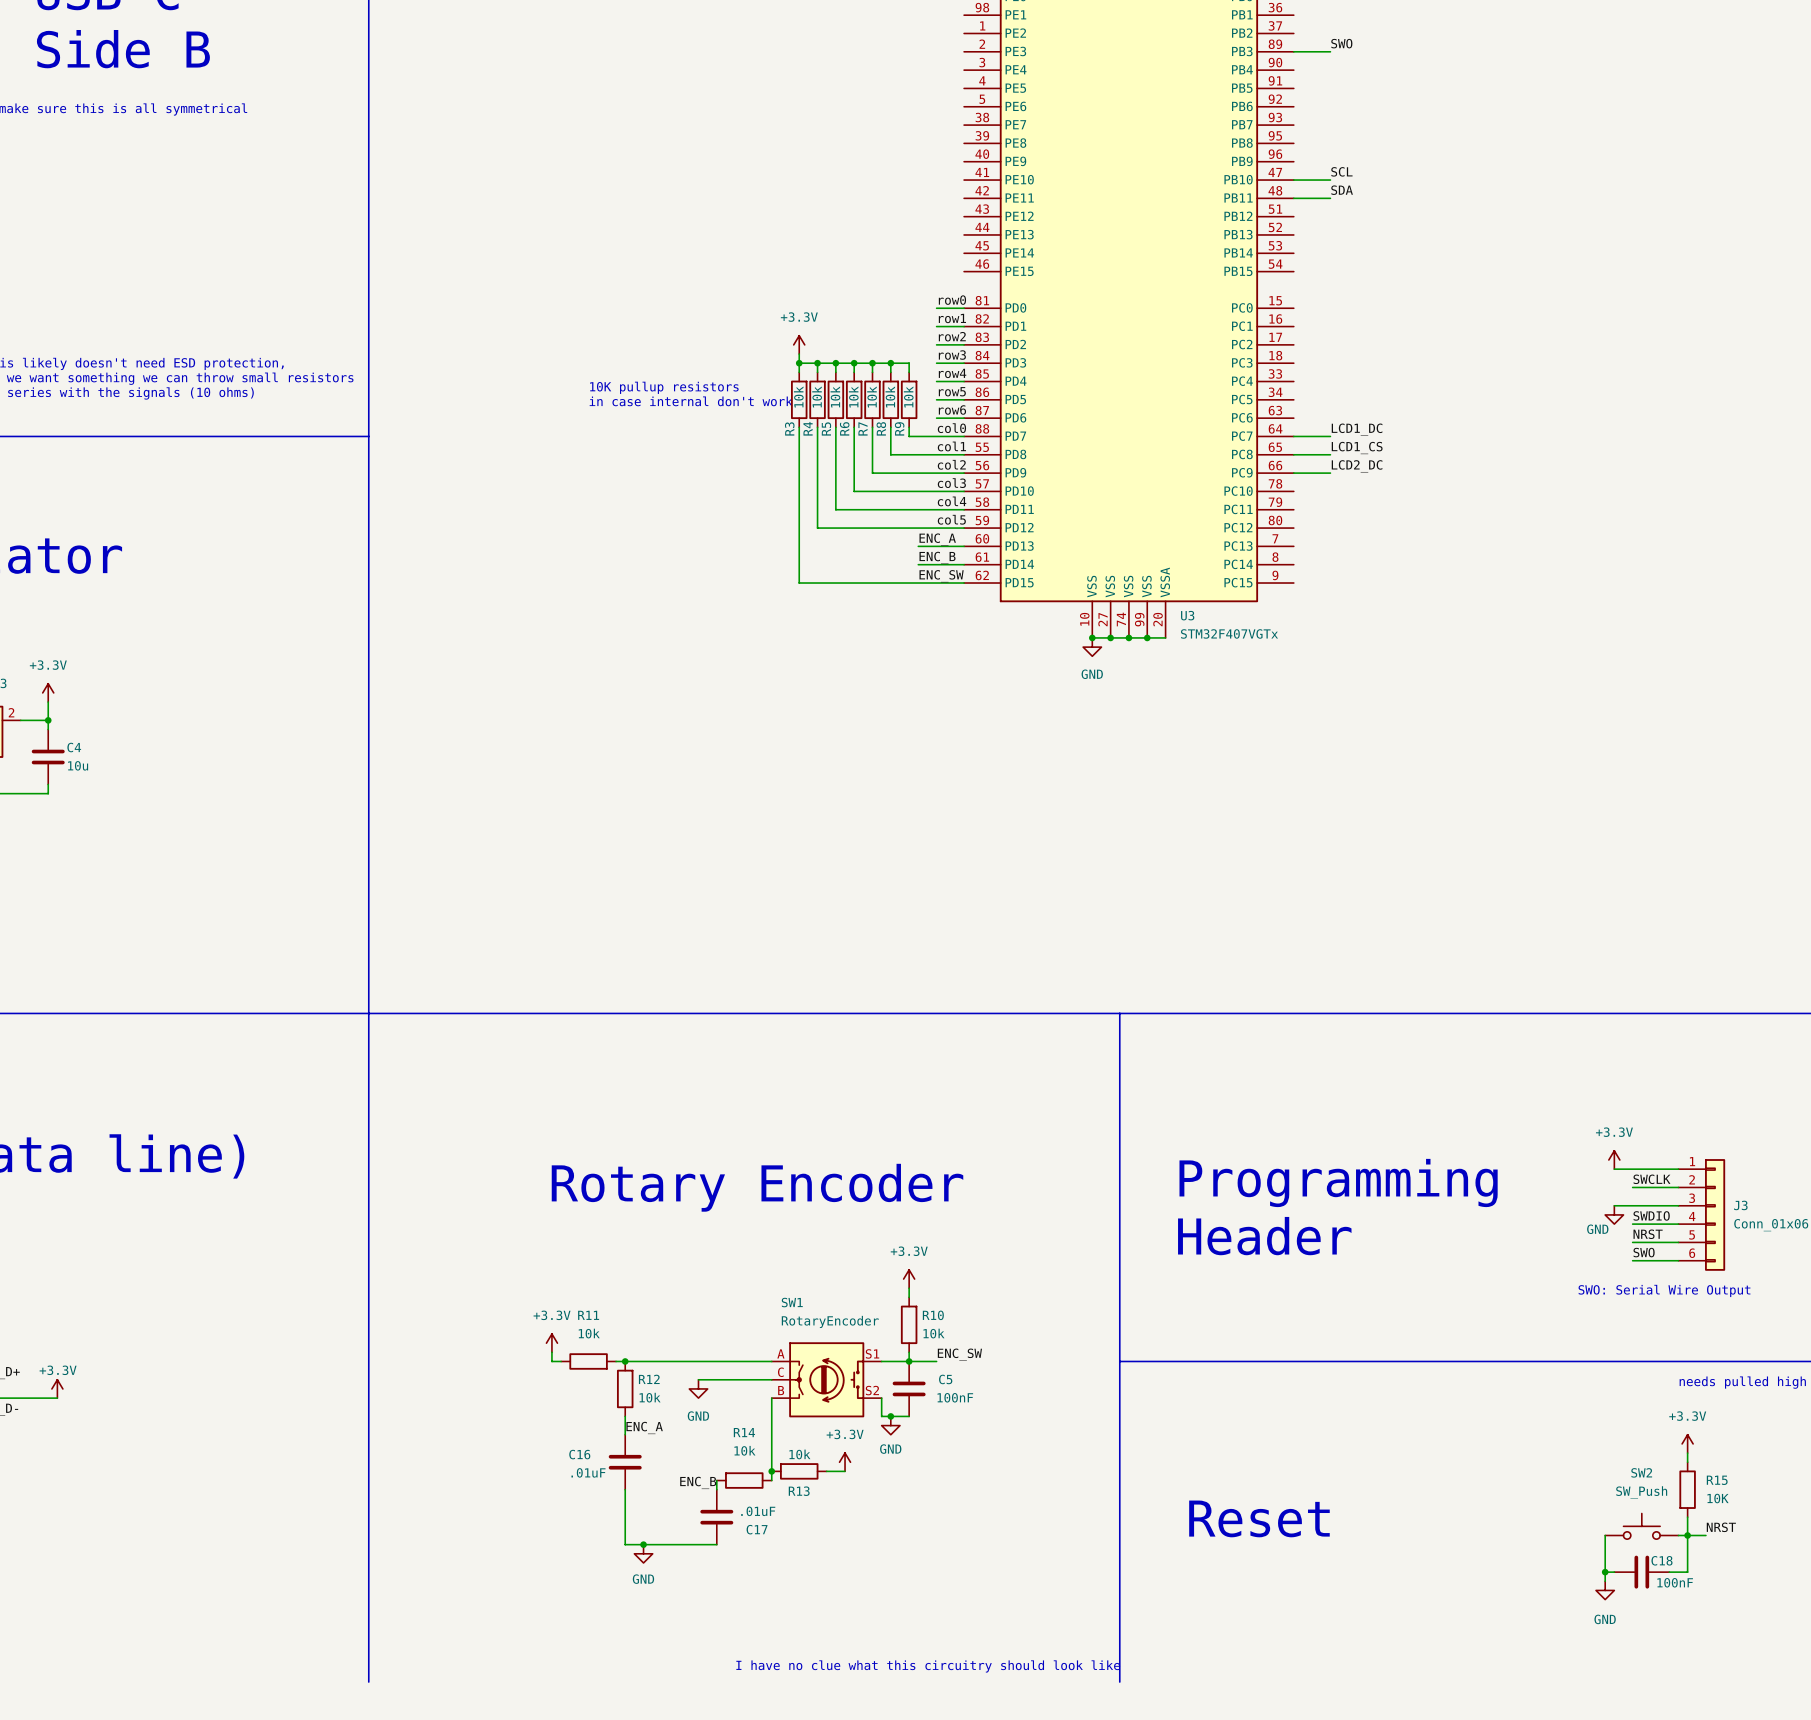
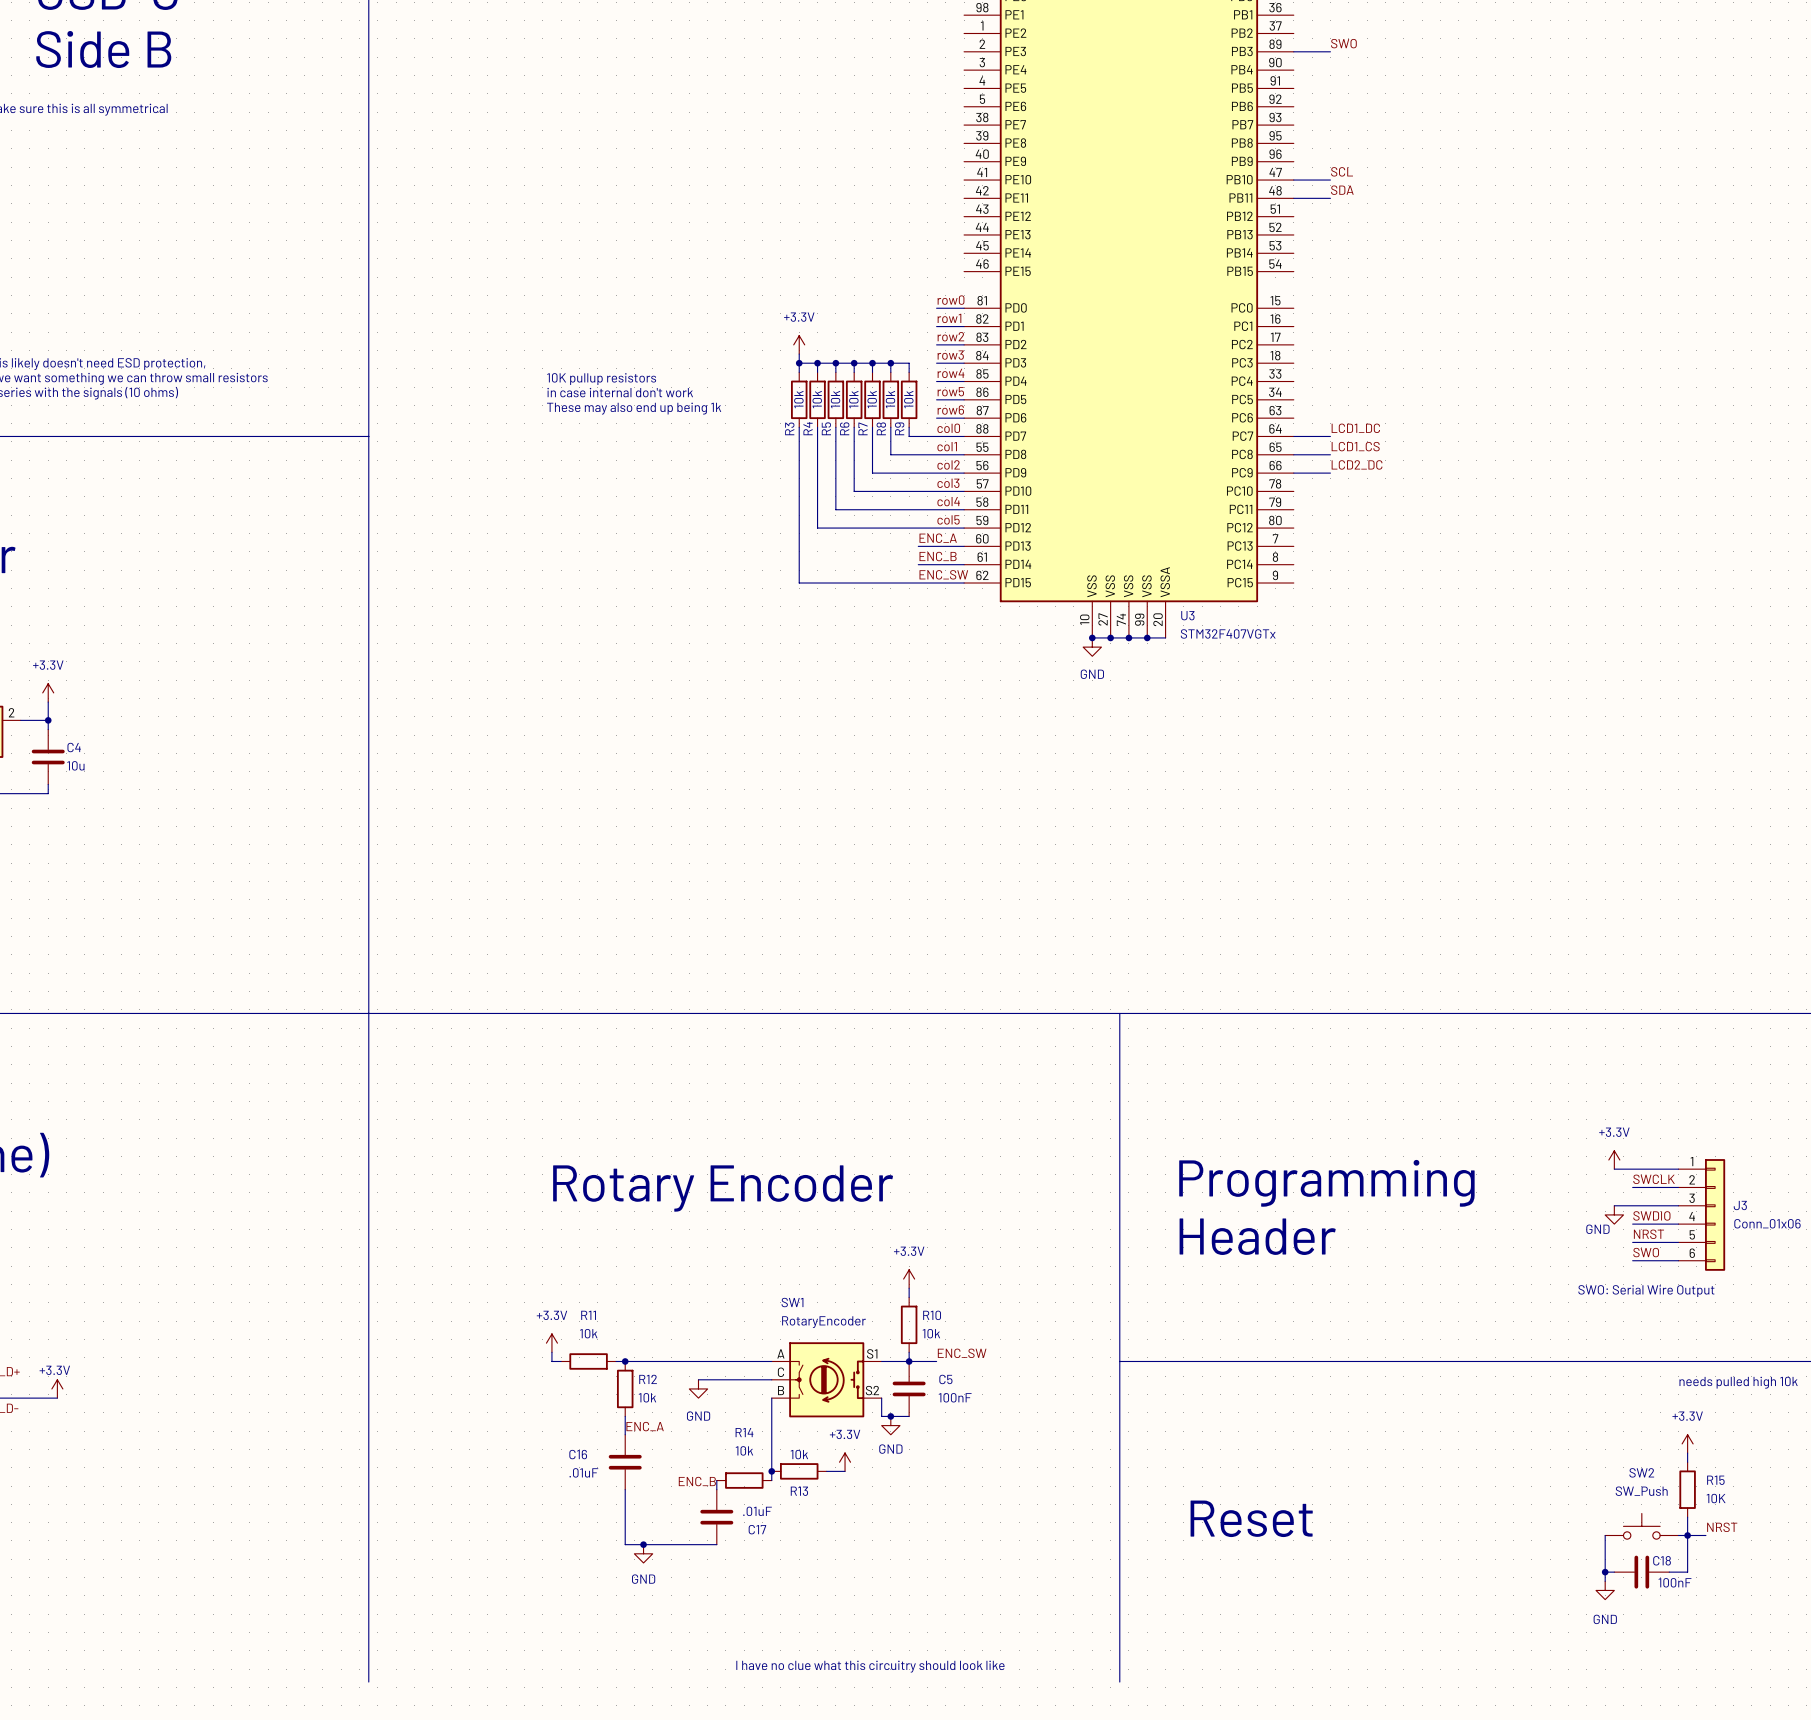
text position: 10K pullup resistors (664, 387) -> 10K pullup resistors (601, 379)
text position: in case internal don't work (691, 401) -> in case internal don't work (620, 392)
text: none -> These may also end up being 1k (634, 408)

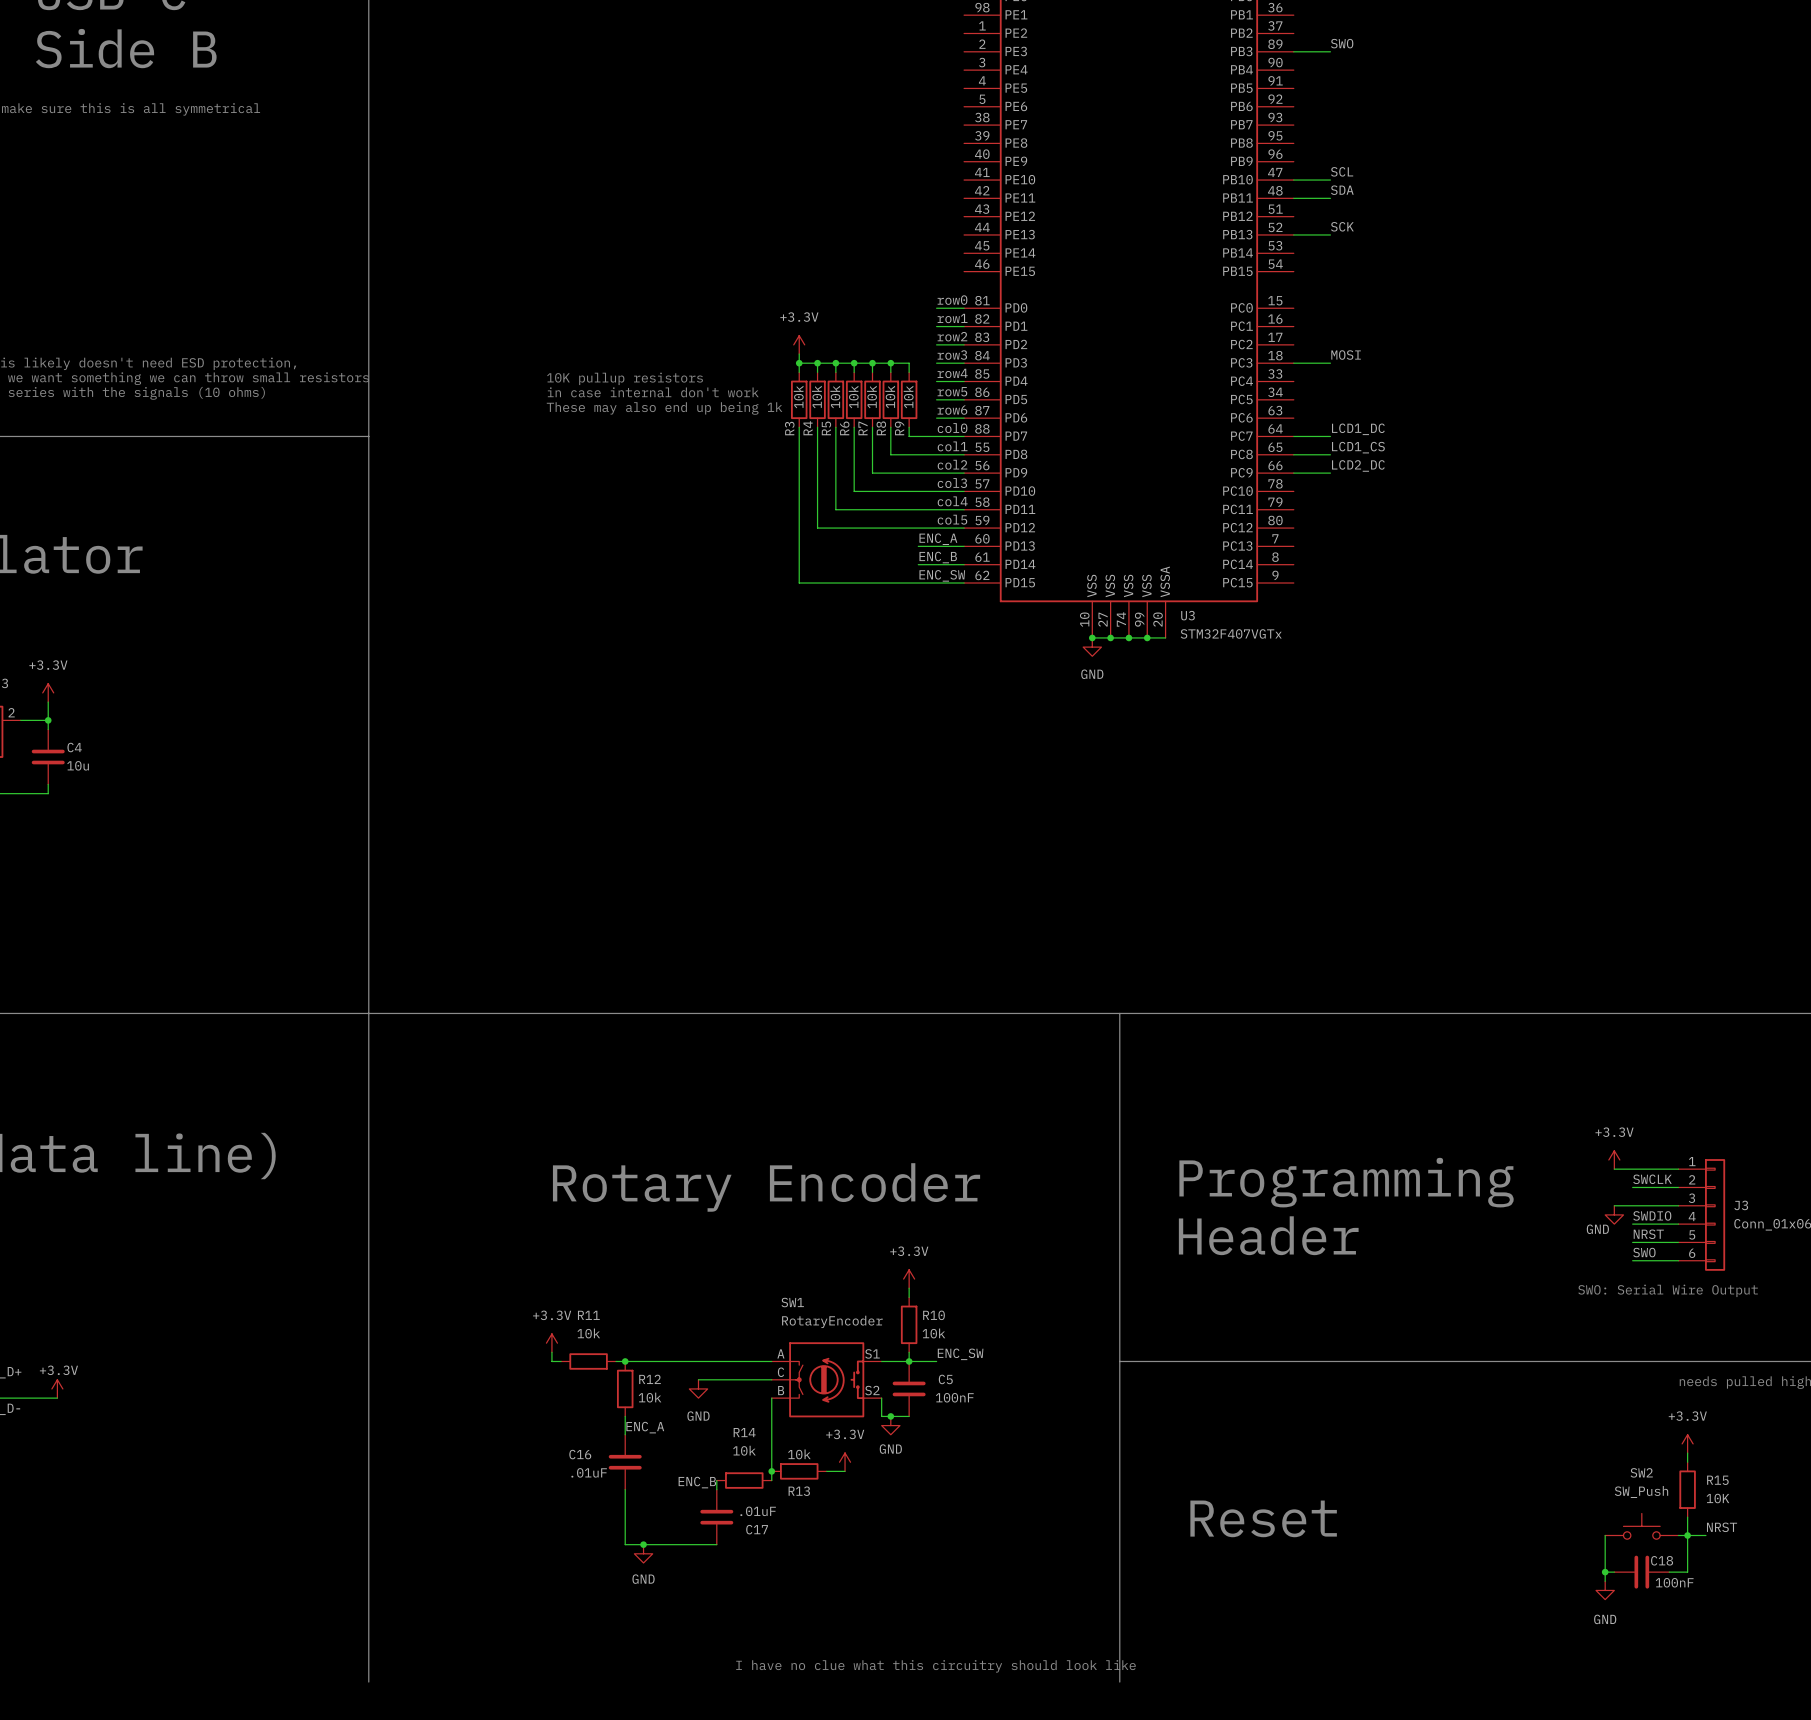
label: none -> SCK (1342, 226)
wire: none -> (1293, 234) (1330, 234)
label: none -> MOSI (1346, 355)
wire: none -> (1293, 363) (1330, 363)

